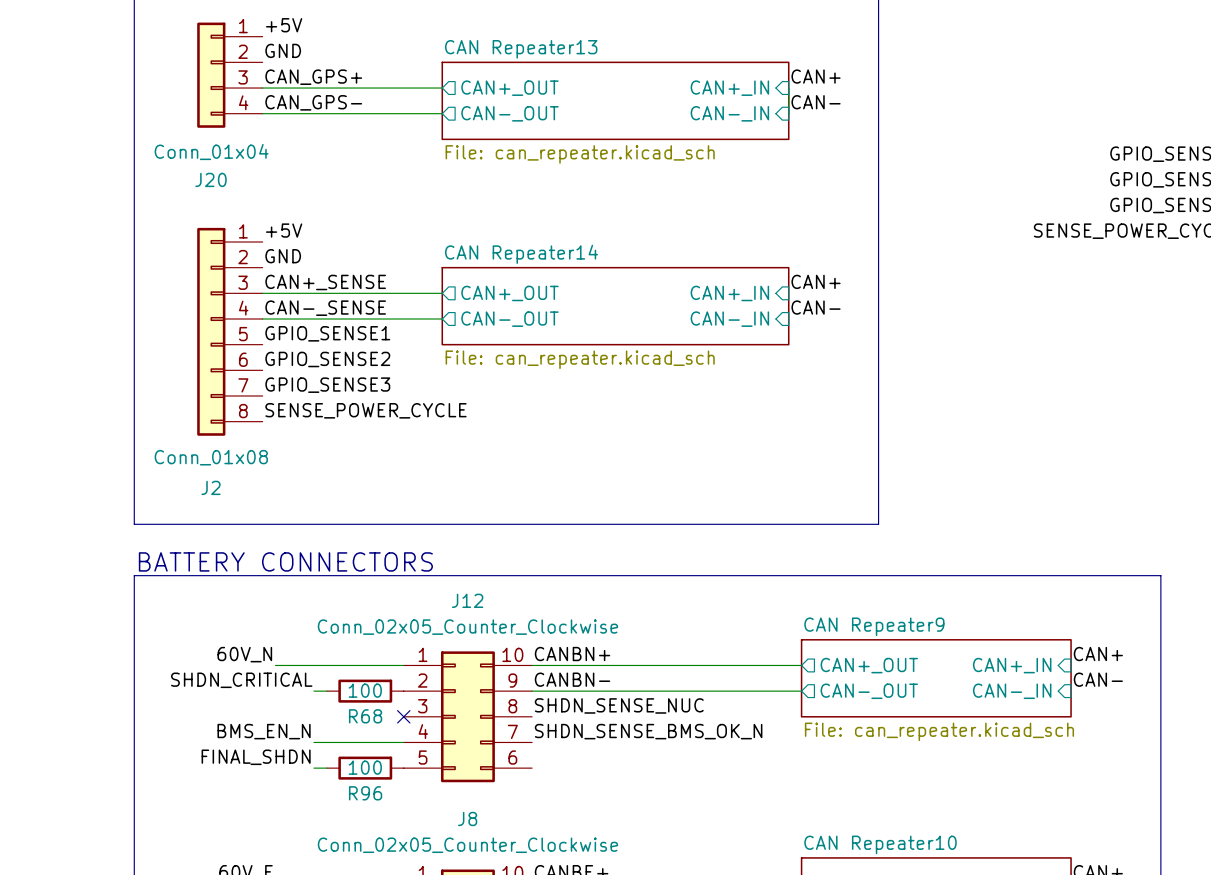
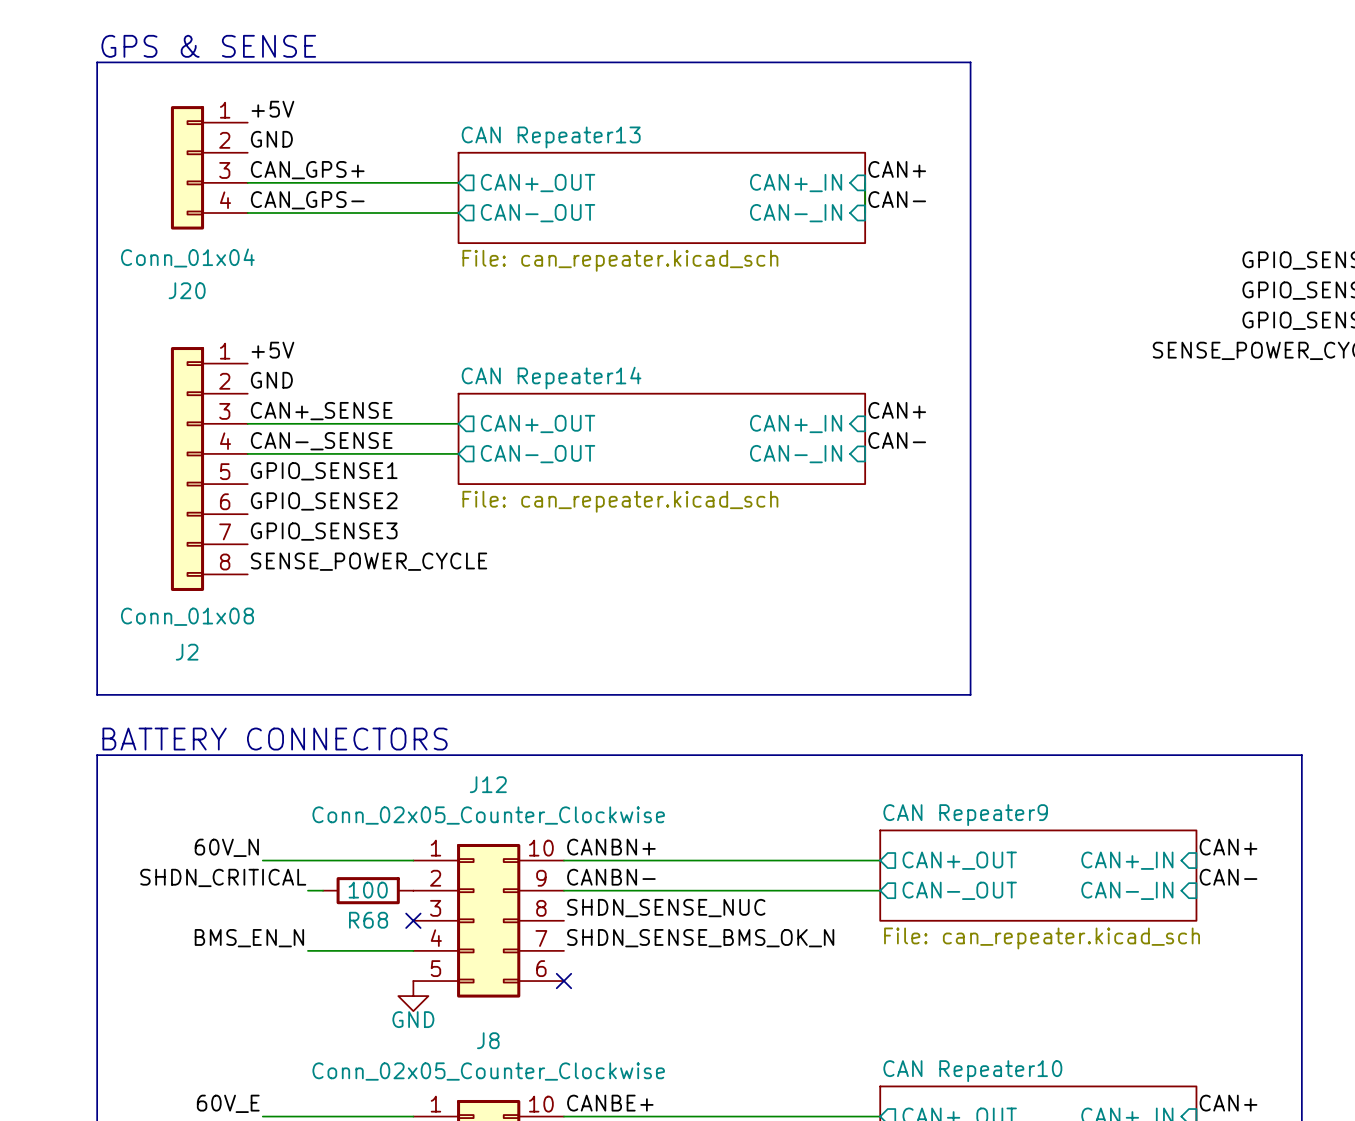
label: FINAL_SHDN (256, 757) -> none
wire: (313, 768) (326, 768) -> none
R96: 100 (365, 768) -> none
no-connect mark: none -> (563, 981)
power symbol: none -> GND (413, 996)

